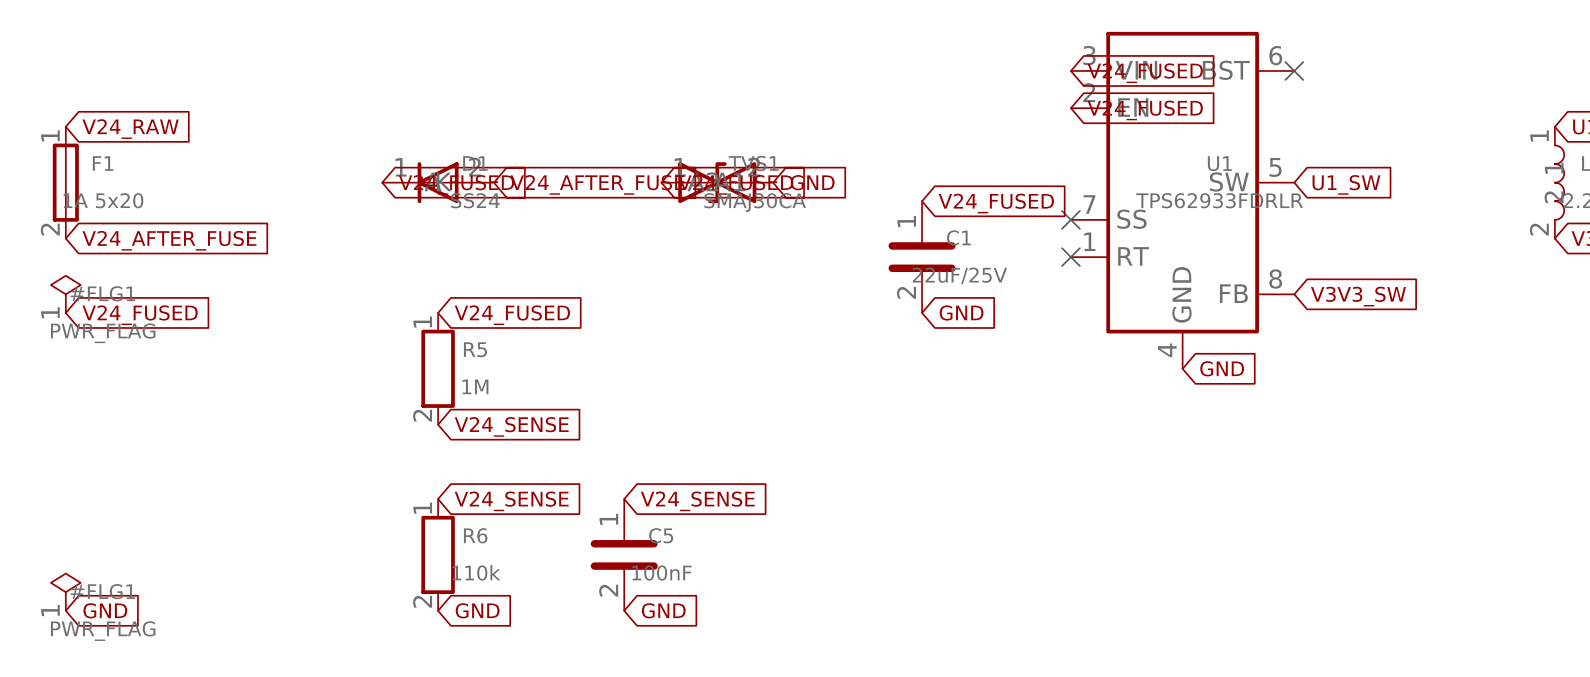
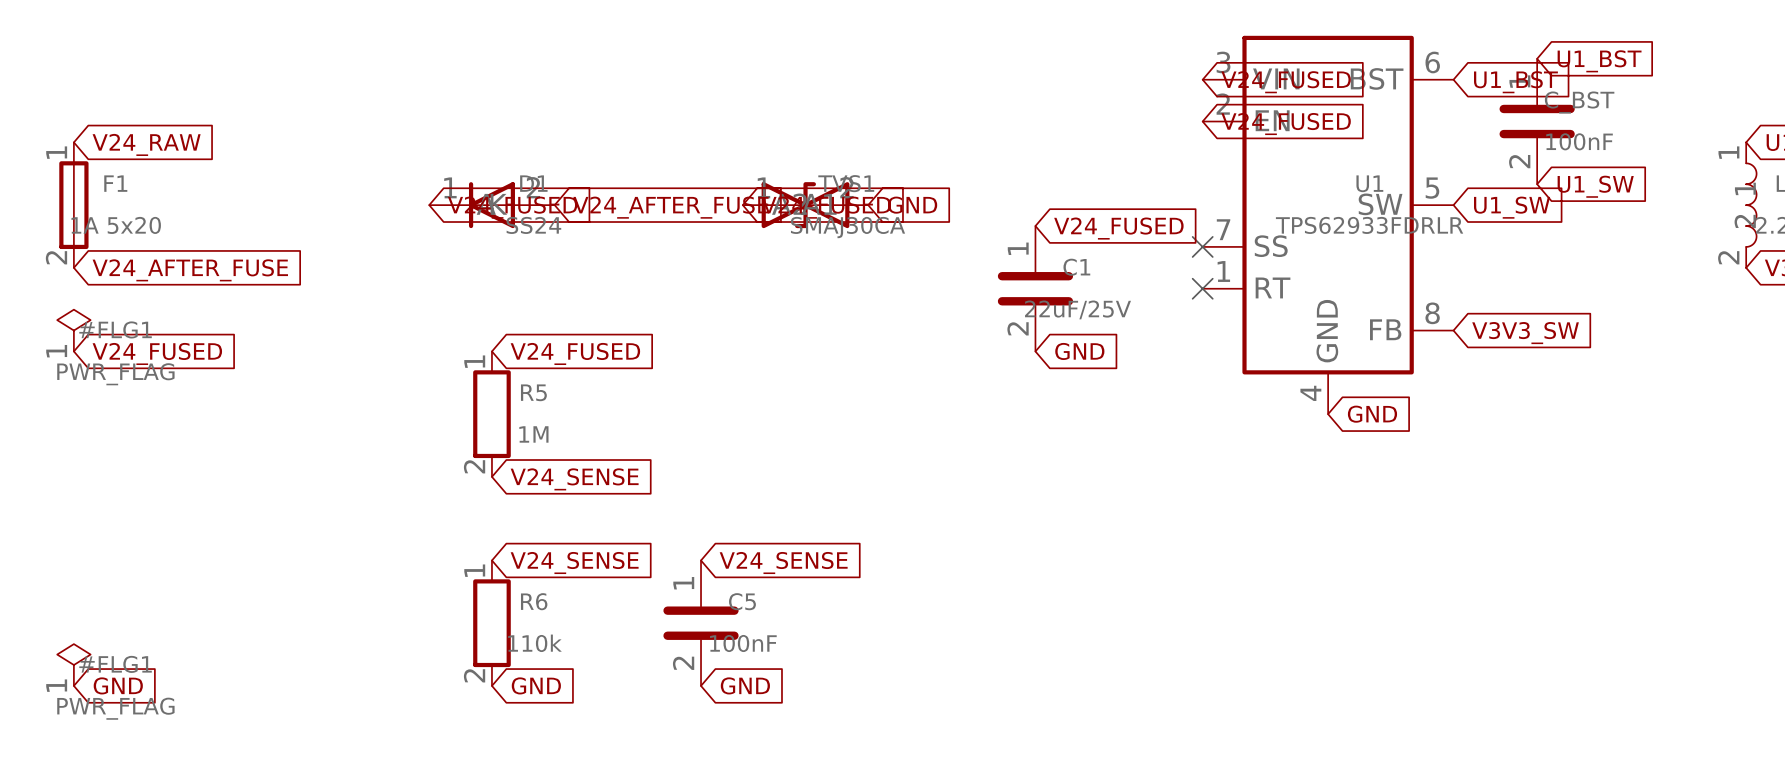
global label: none -> U1_BST (1599, 61)
no-connect mark: (1294, 70) -> none
global label: none -> U1_BST (1515, 82)
C_BST: none -> 100nF (1537, 121)
global label: none -> U1_SW (1595, 186)

